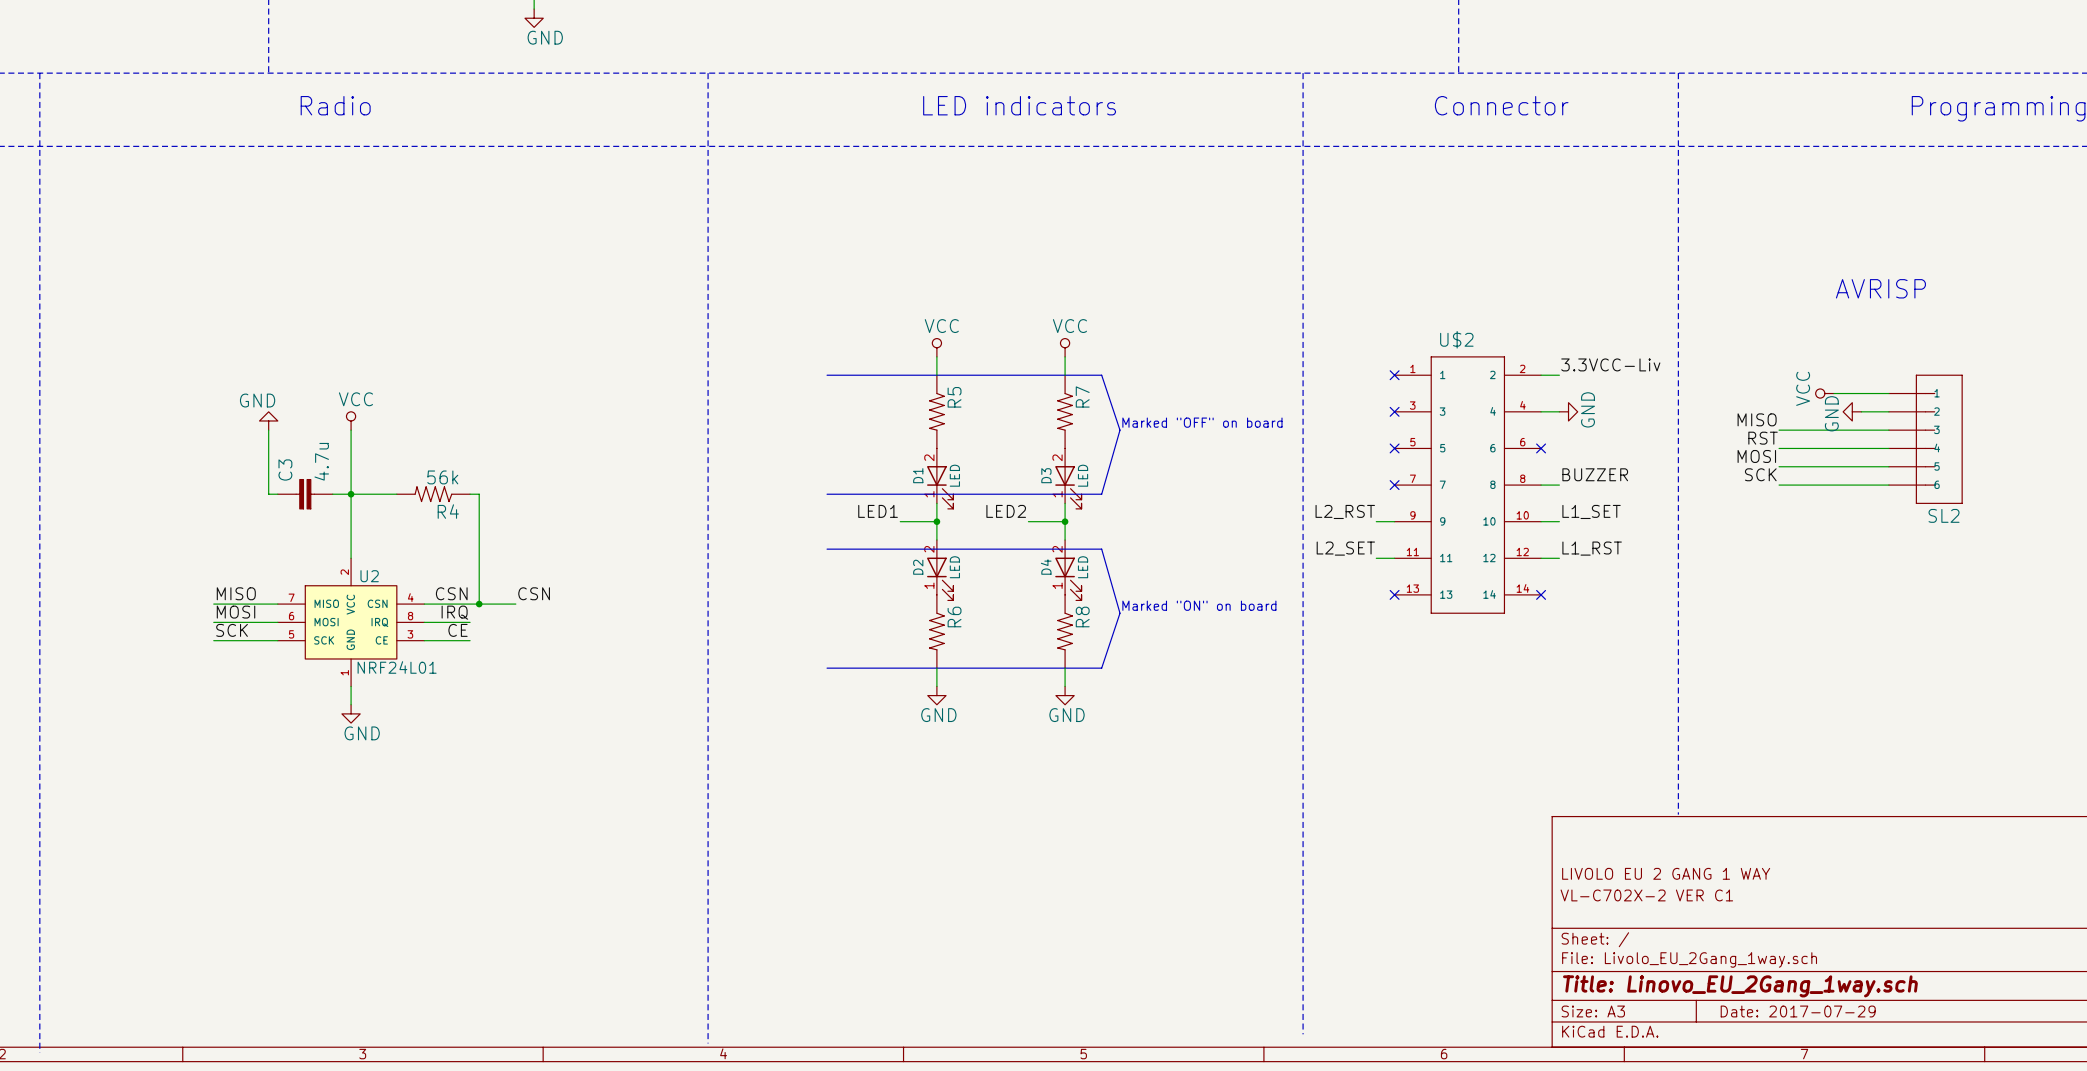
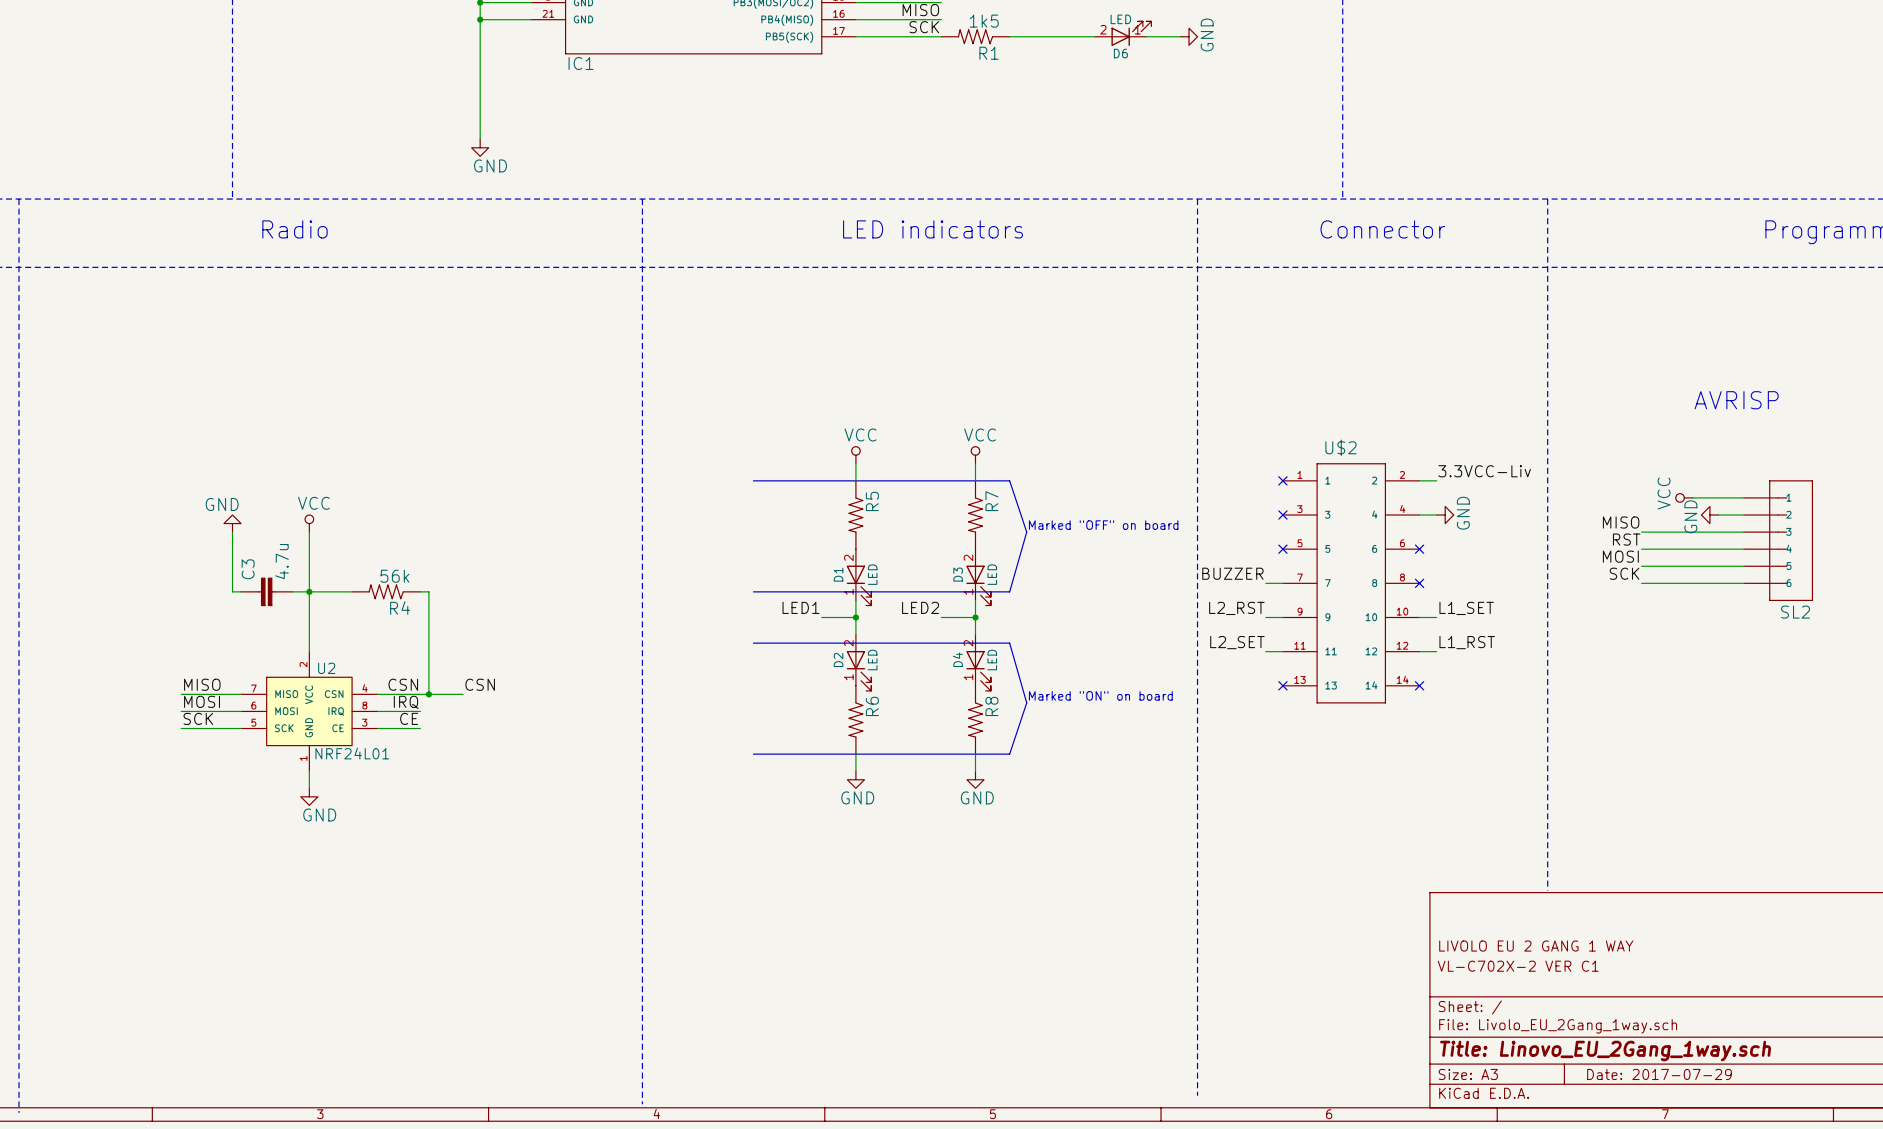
label: none -> BUZZER (1232, 573)
label: BUZZER (1595, 474) -> none
no-connect mark: (1394, 485) -> none
wire: (1541, 485) (1559, 485) -> (1265, 583) (1282, 583)
no-connect mark: none -> (1419, 583)

